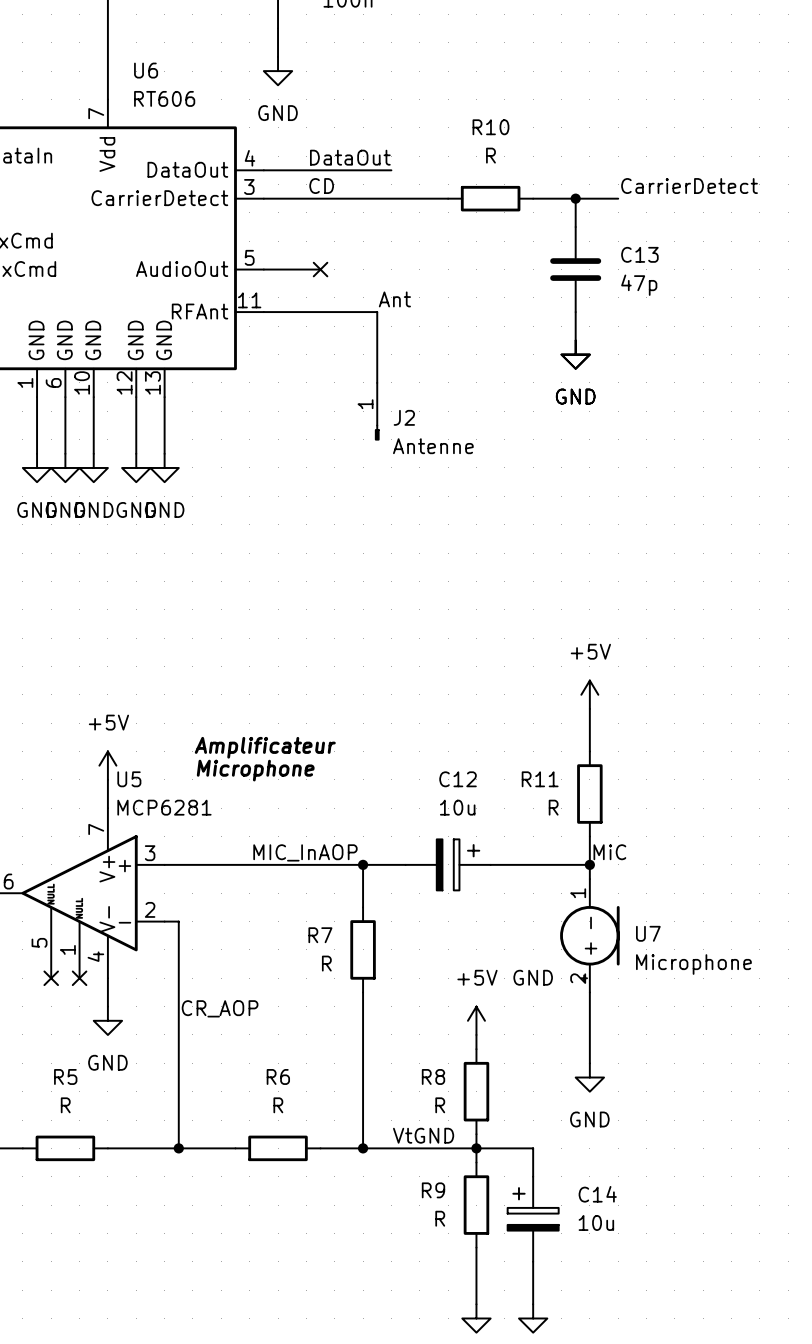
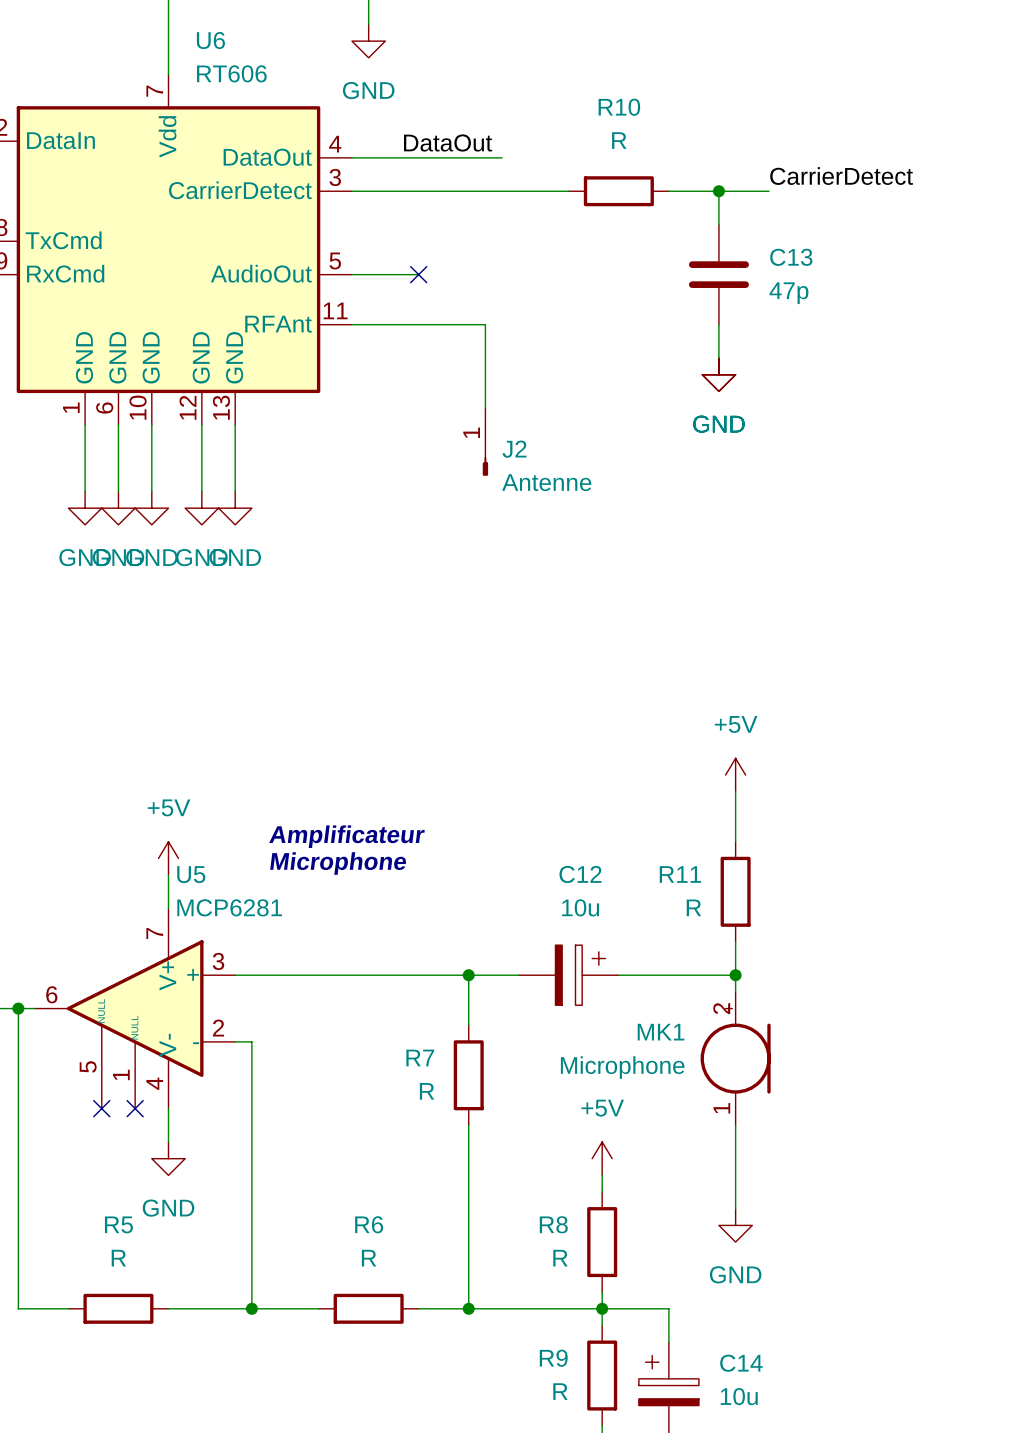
label: CD (321, 186) -> none
label: Ant (394, 299) -> none
label: MIC_InAOP (305, 852) -> none
label: MiC (609, 852) -> none
U7: Microphone (589, 935) -> none
MK1: none -> Microphone (735, 1058)
label: CR_AOP (220, 1008) -> none
label: VtGND (423, 1135) -> none

